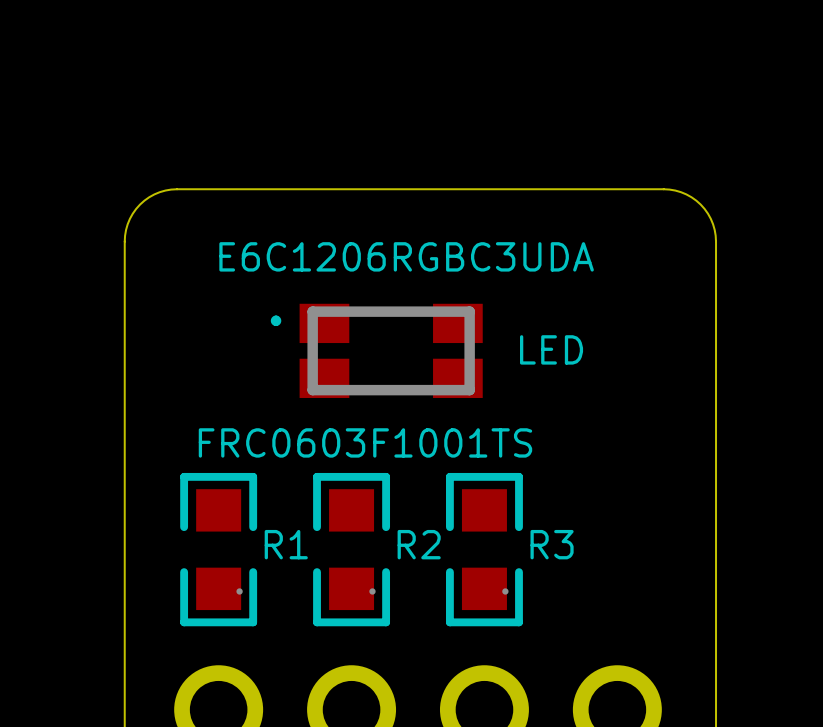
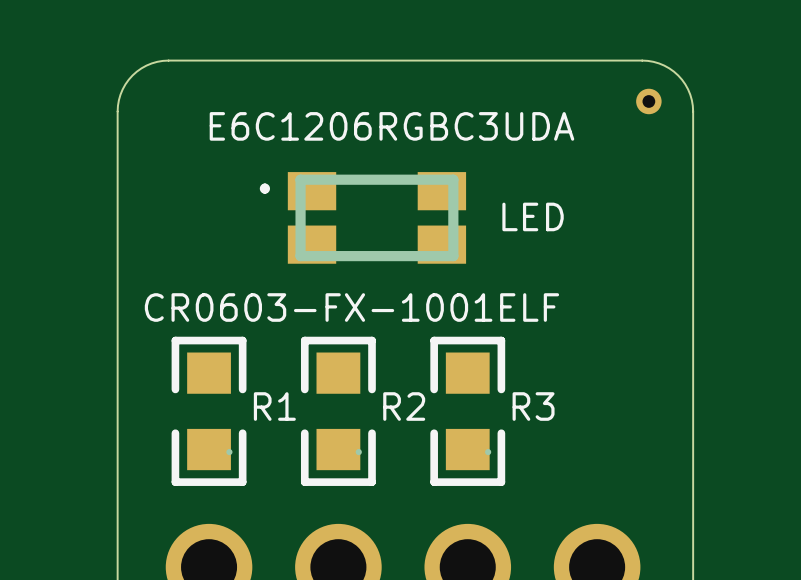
part: none -> (648, 101)
text: FRC0603F1001TS (365, 442) -> CR0603-FX-1001ELF (351, 307)

